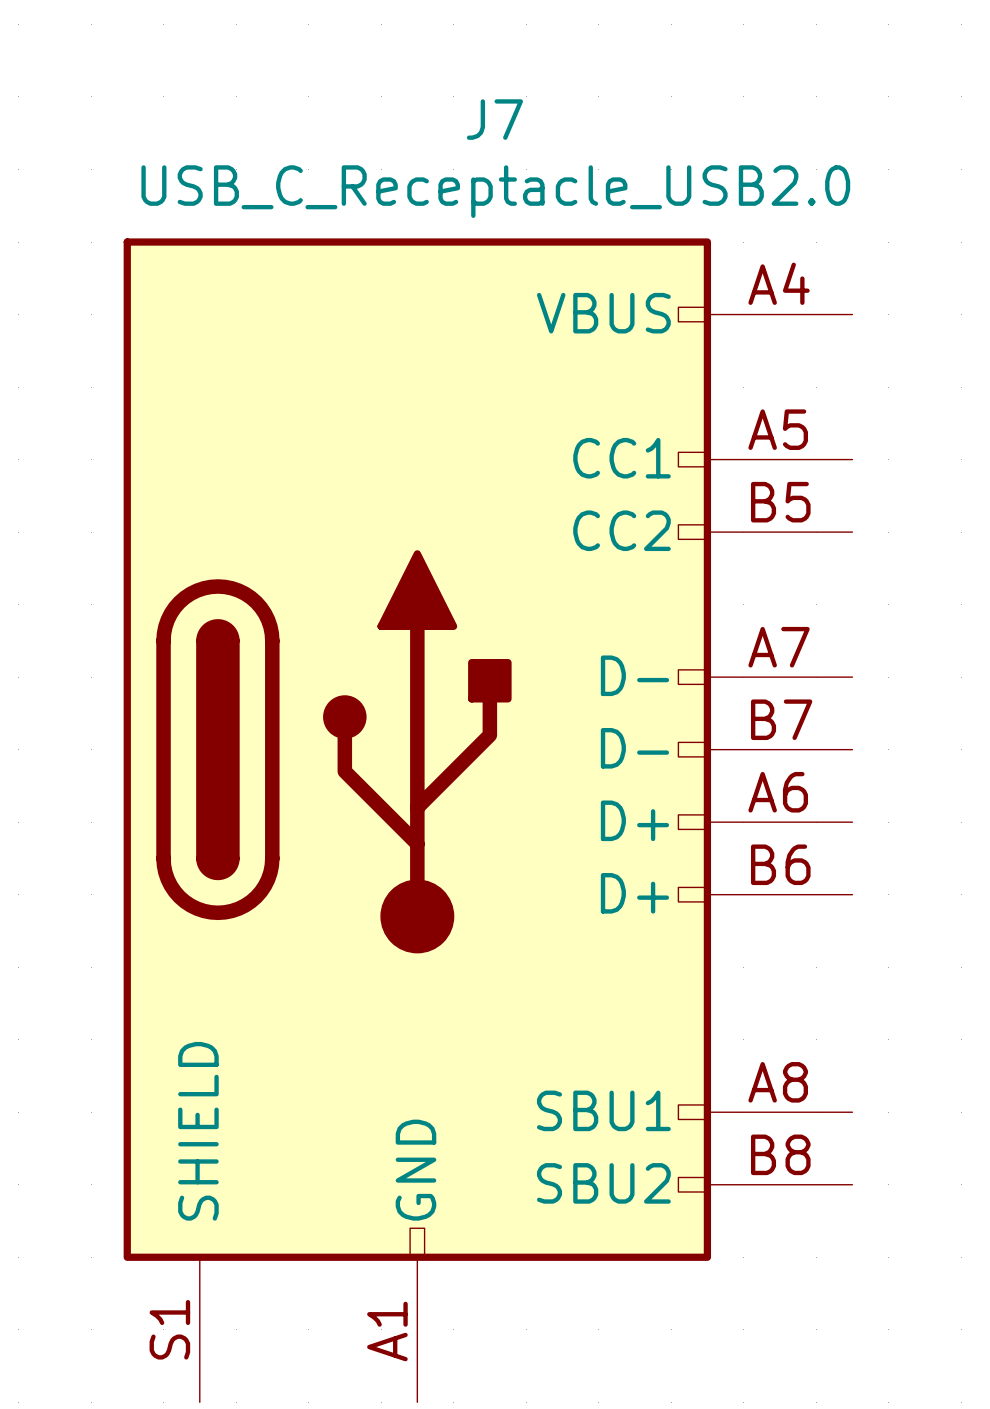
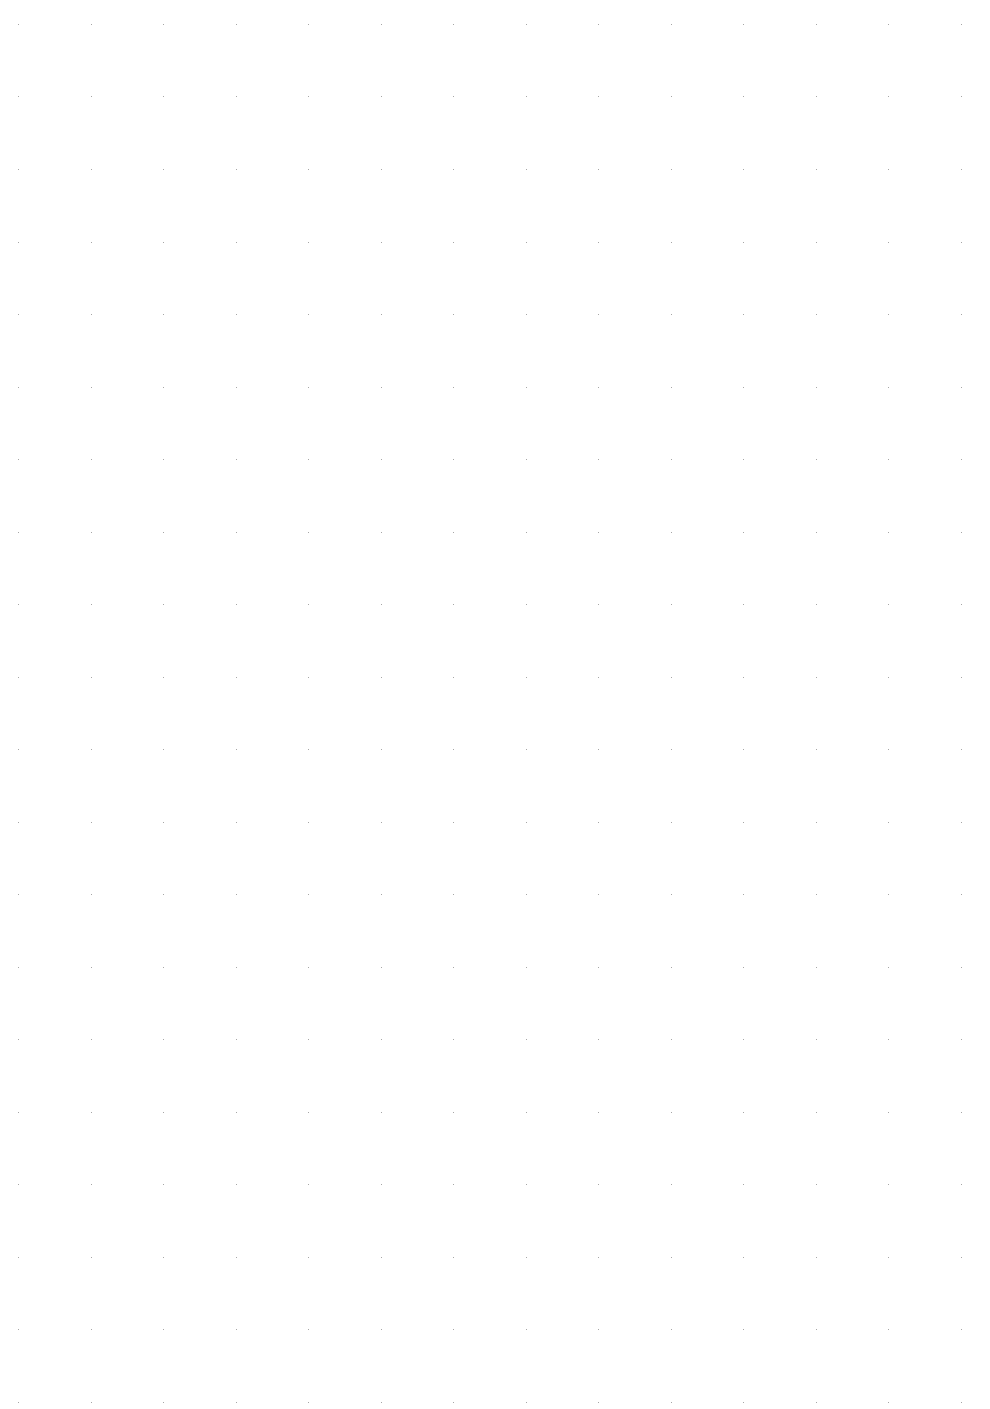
J7: USB_C_Receptacle_USB2.0 (488, 820) -> none

